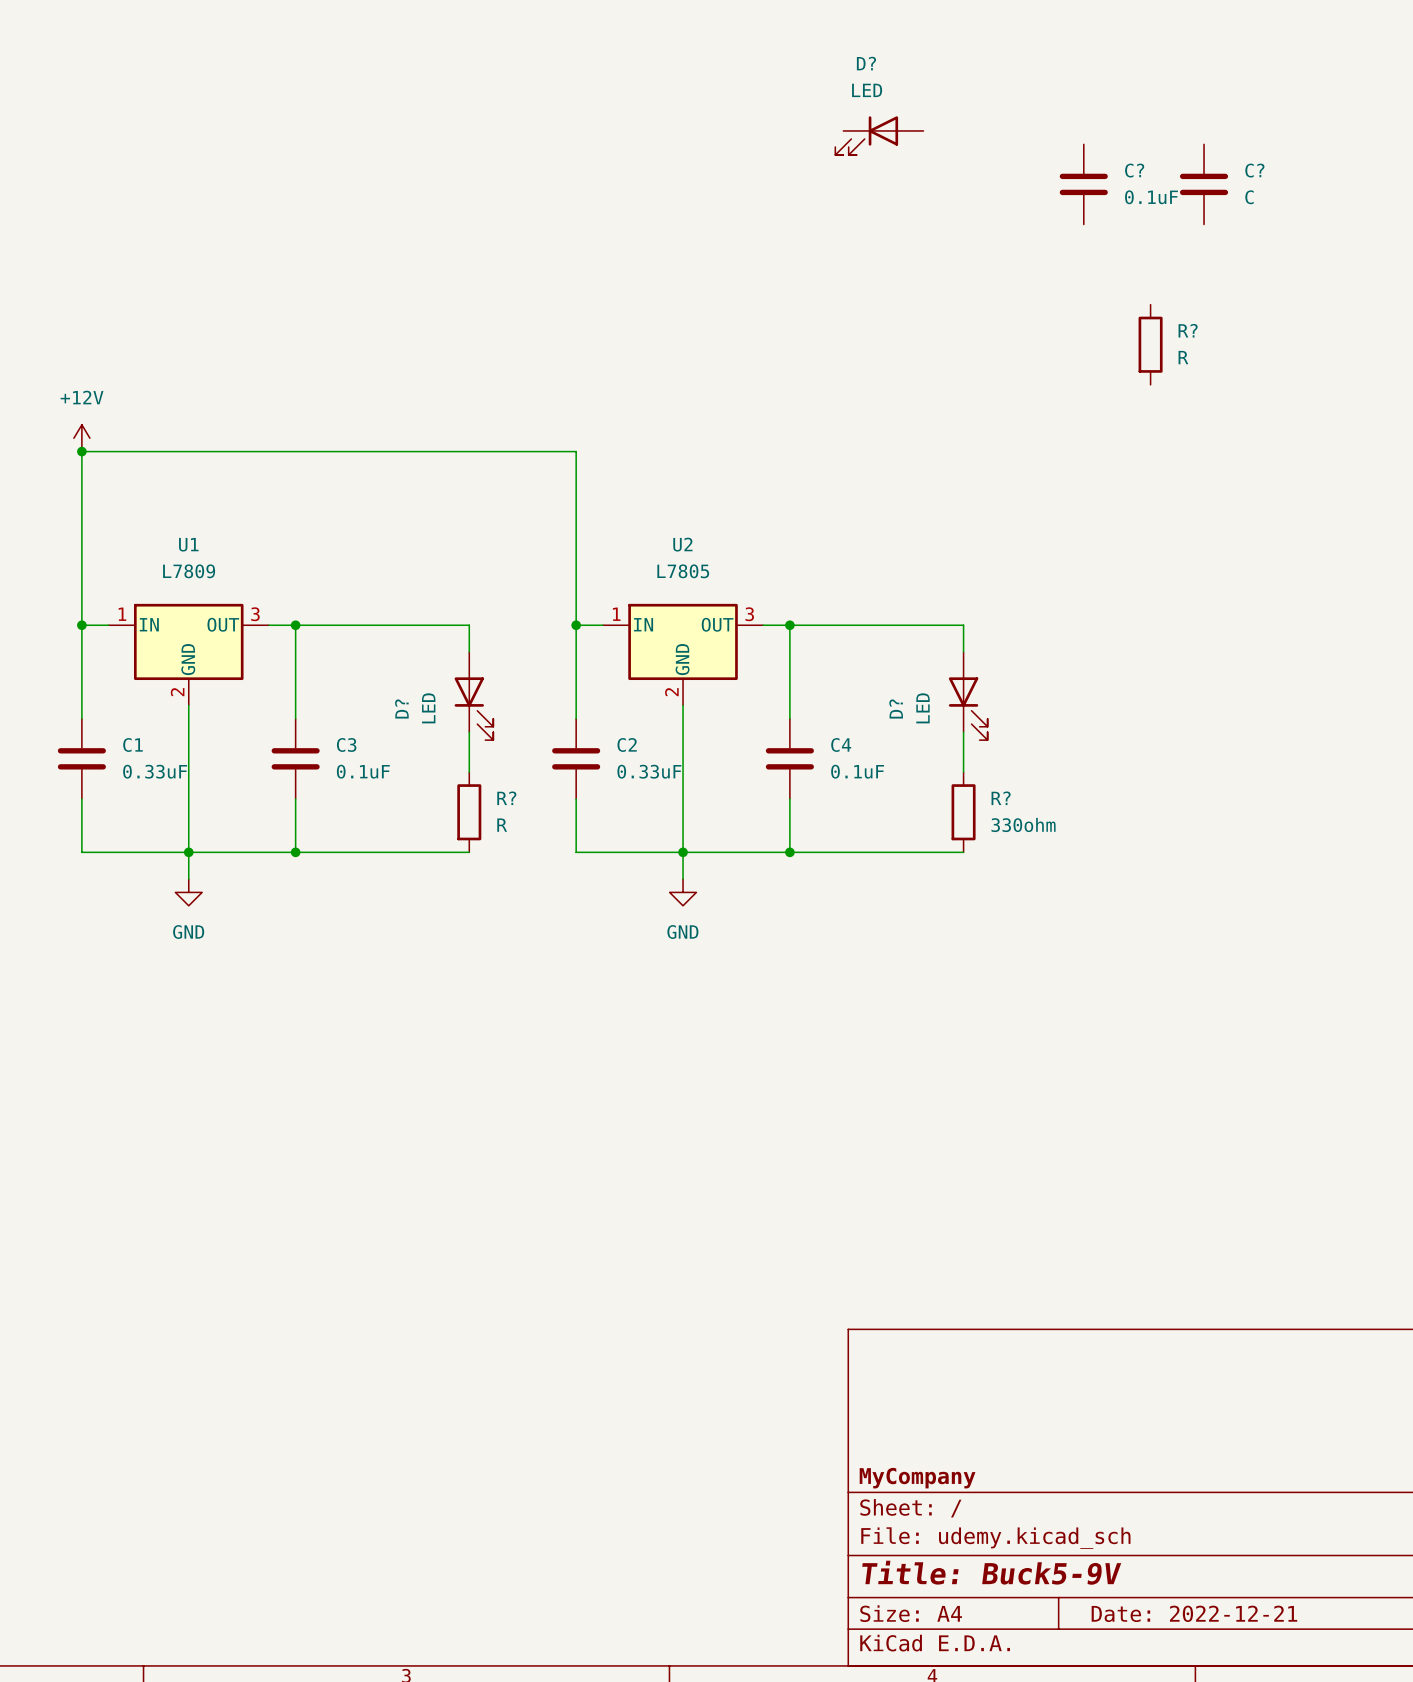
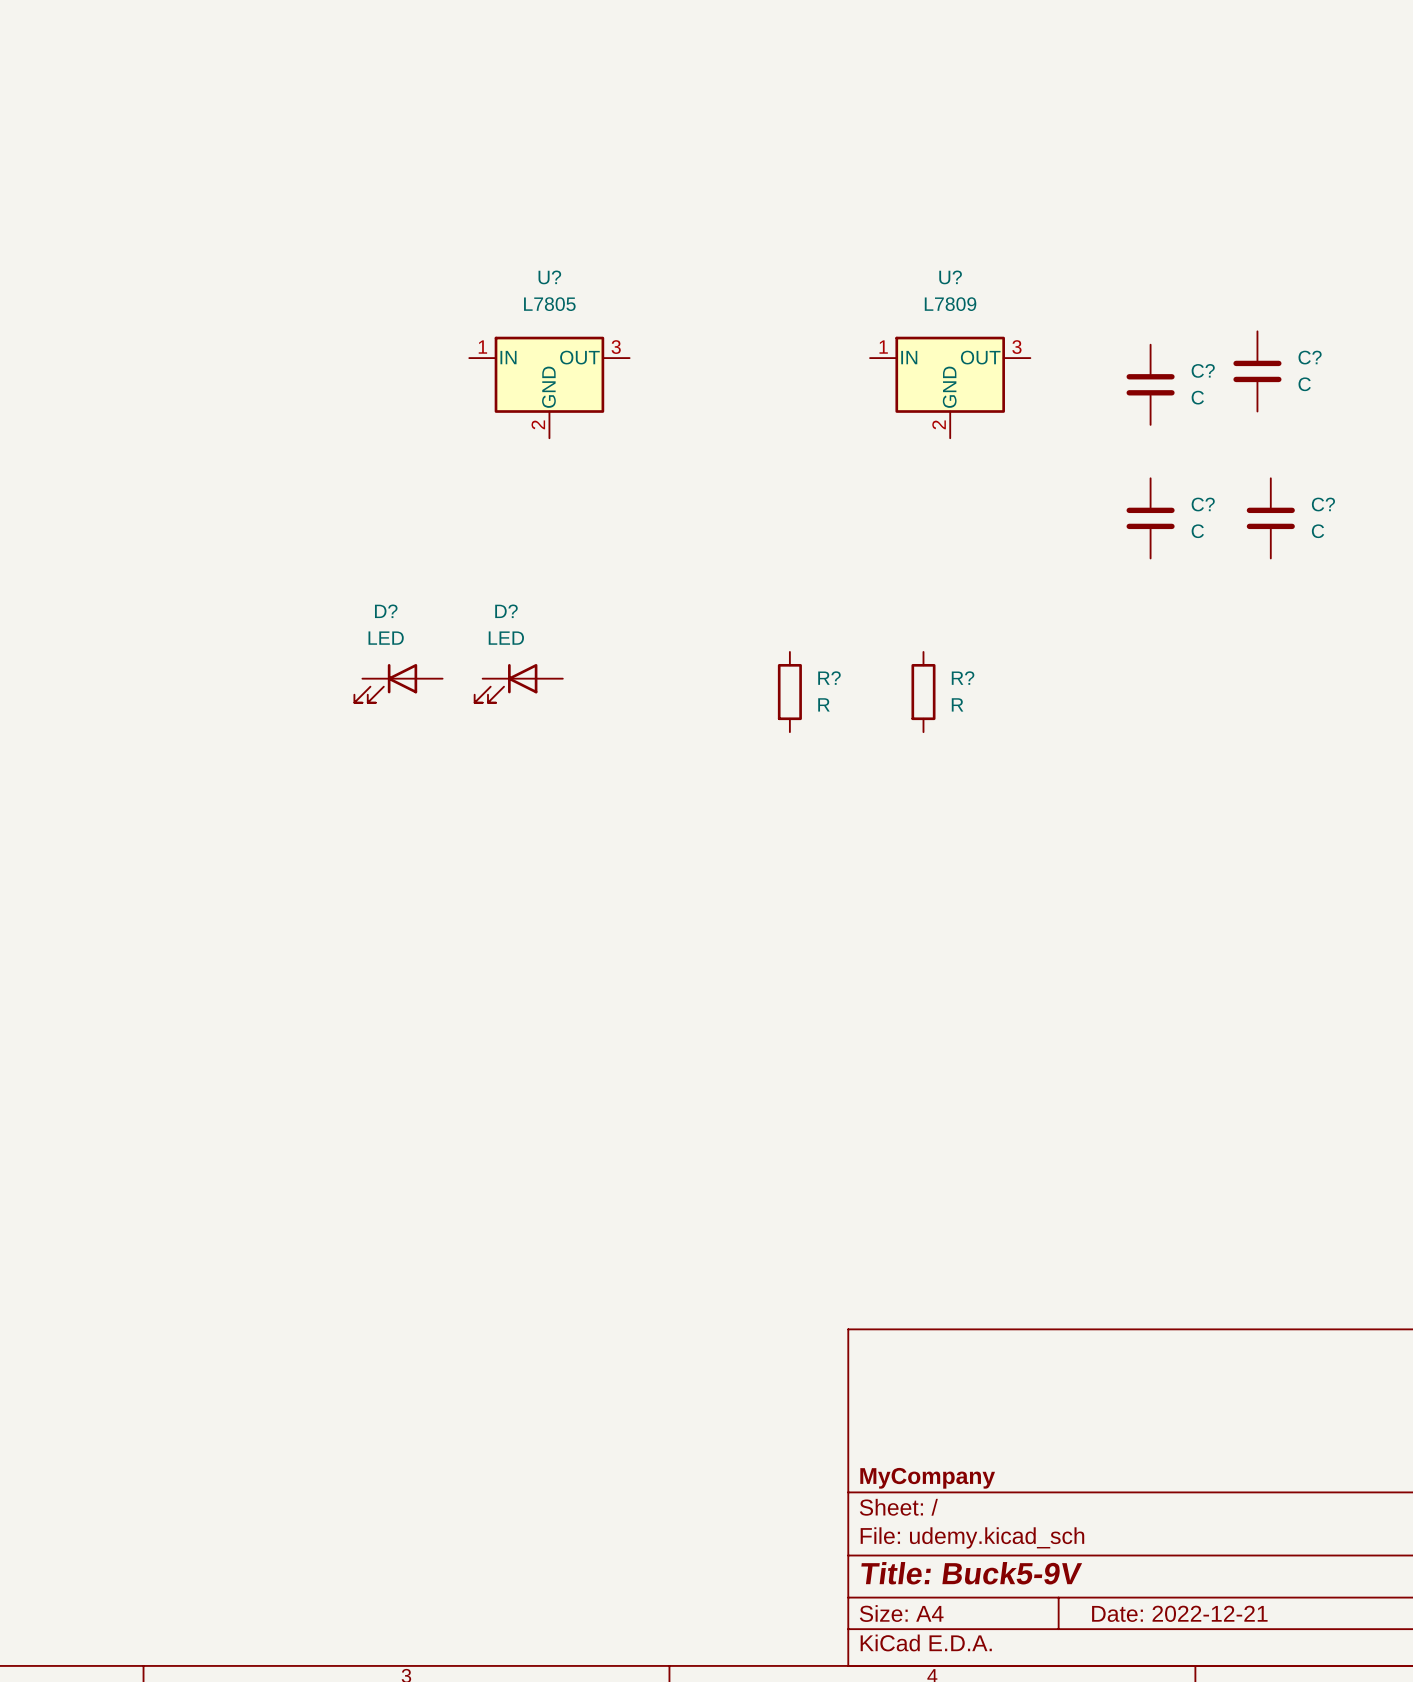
D?: LED (879, 135) -> none
C?: 0.1uF (1083, 184) -> none
C?: C (1204, 184) -> none
R?: R (1150, 344) -> none
C?: none -> C (1257, 371)
C?: none -> C (1150, 384)
U?: none -> L7805 (549, 387)
U?: none -> L7809 (950, 387)
power symbol: +12V (81, 438) -> none
junction: (81, 451) -> none
C?: none -> C (1150, 518)
C?: none -> C (1270, 518)
wire: (81, 625) (108, 625) -> none
junction: (81, 625) -> none
wire: (268, 625) (469, 625) (469, 651) -> none
wire: (295, 625) (295, 718) -> none
junction: (295, 625) -> none
wire: (576, 625) (602, 625) -> none
junction: (576, 625) -> none
wire: (763, 625) (963, 625) (963, 651) -> none
wire: (789, 625) (789, 718) -> none
junction: (789, 625) -> none
U1: L7809 (188, 654) -> none
U2: L7805 (683, 654) -> none
D?: none -> LED (398, 683)
D?: none -> LED (518, 683)
R?: none -> R (789, 692)
R?: none -> R (923, 692)
D?: LED (473, 696) -> none
D?: LED (968, 696) -> none
wire: (188, 705) (188, 879) -> none
wire: (683, 705) (683, 879) -> none
wire: (81, 718) (81, 451) (576, 451) (576, 718) -> none
wire: (469, 732) (469, 772) -> none
wire: (963, 732) (963, 772) -> none
C1: 0.33uF (81, 758) -> none
C3: 0.1uF (295, 758) -> none
C2: 0.33uF (576, 758) -> none
C4: 0.1uF (789, 758) -> none
wire: (81, 798) (81, 852) (469, 852) -> none
wire: (295, 798) (295, 852) -> none
wire: (576, 798) (576, 852) (963, 852) -> none
wire: (789, 798) (789, 852) -> none
R?: R (469, 812) -> none
R?: 330ohm (963, 812) -> none
junction: (188, 852) -> none
junction: (295, 852) -> none
junction: (683, 852) -> none
junction: (789, 852) -> none
power symbol: GND (188, 892) -> none
power symbol: GND (683, 892) -> none

